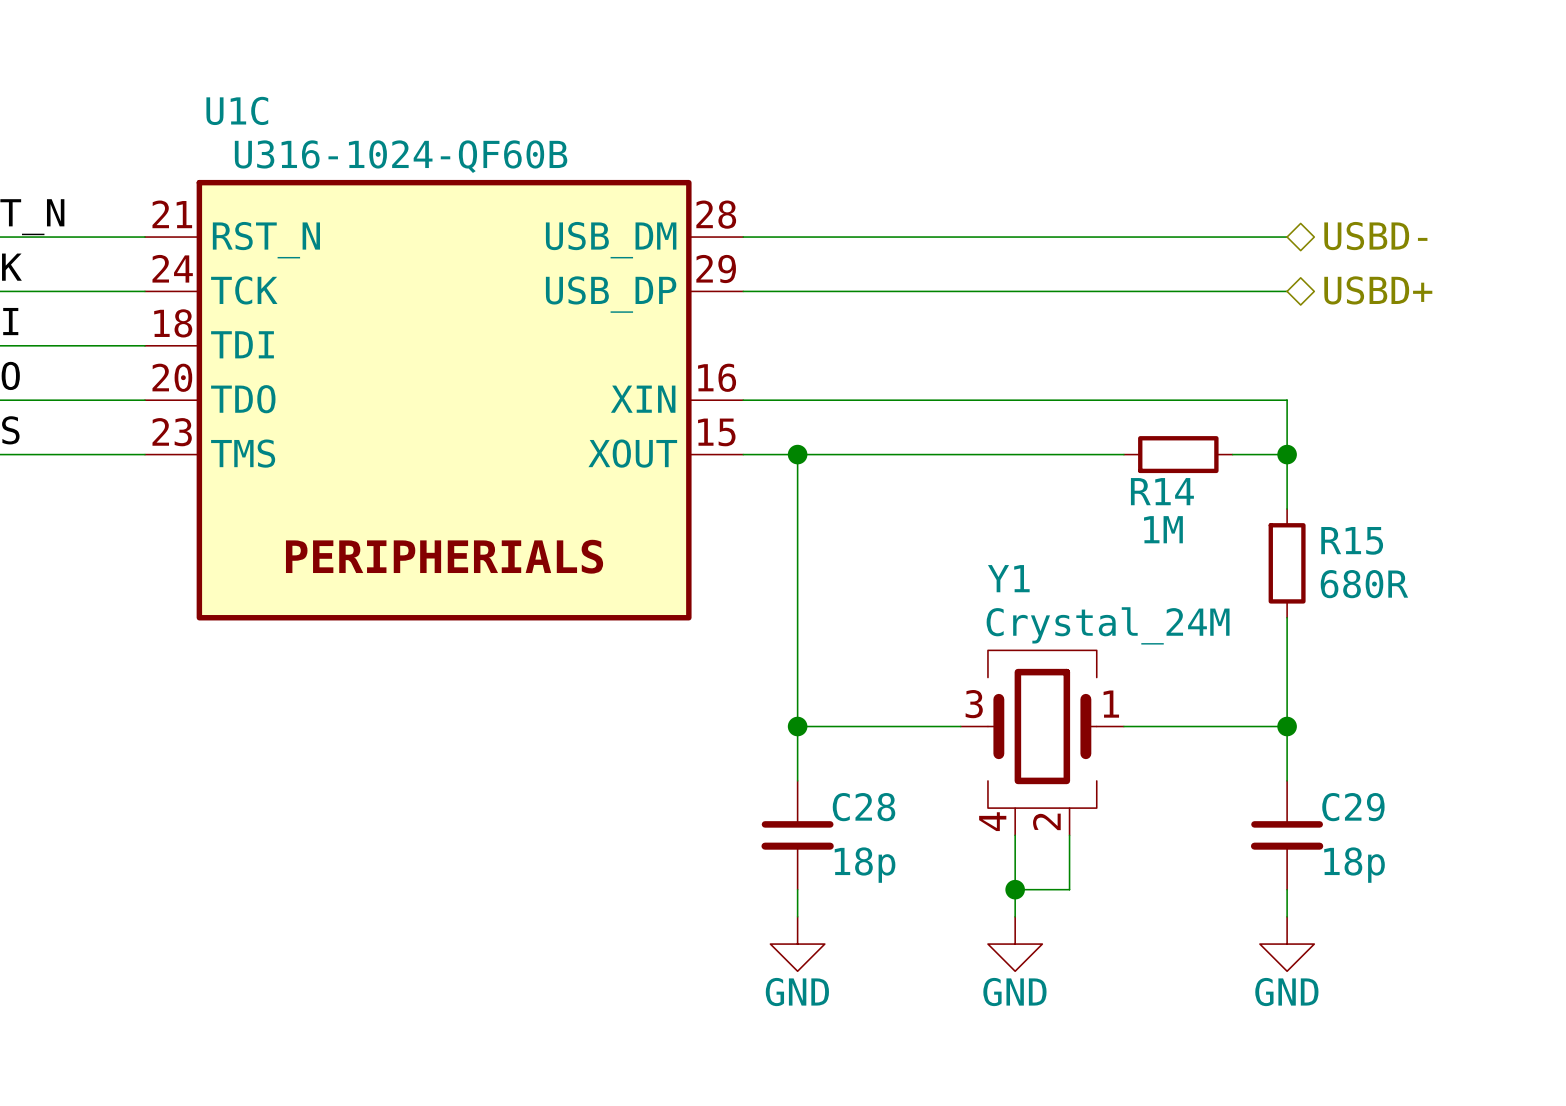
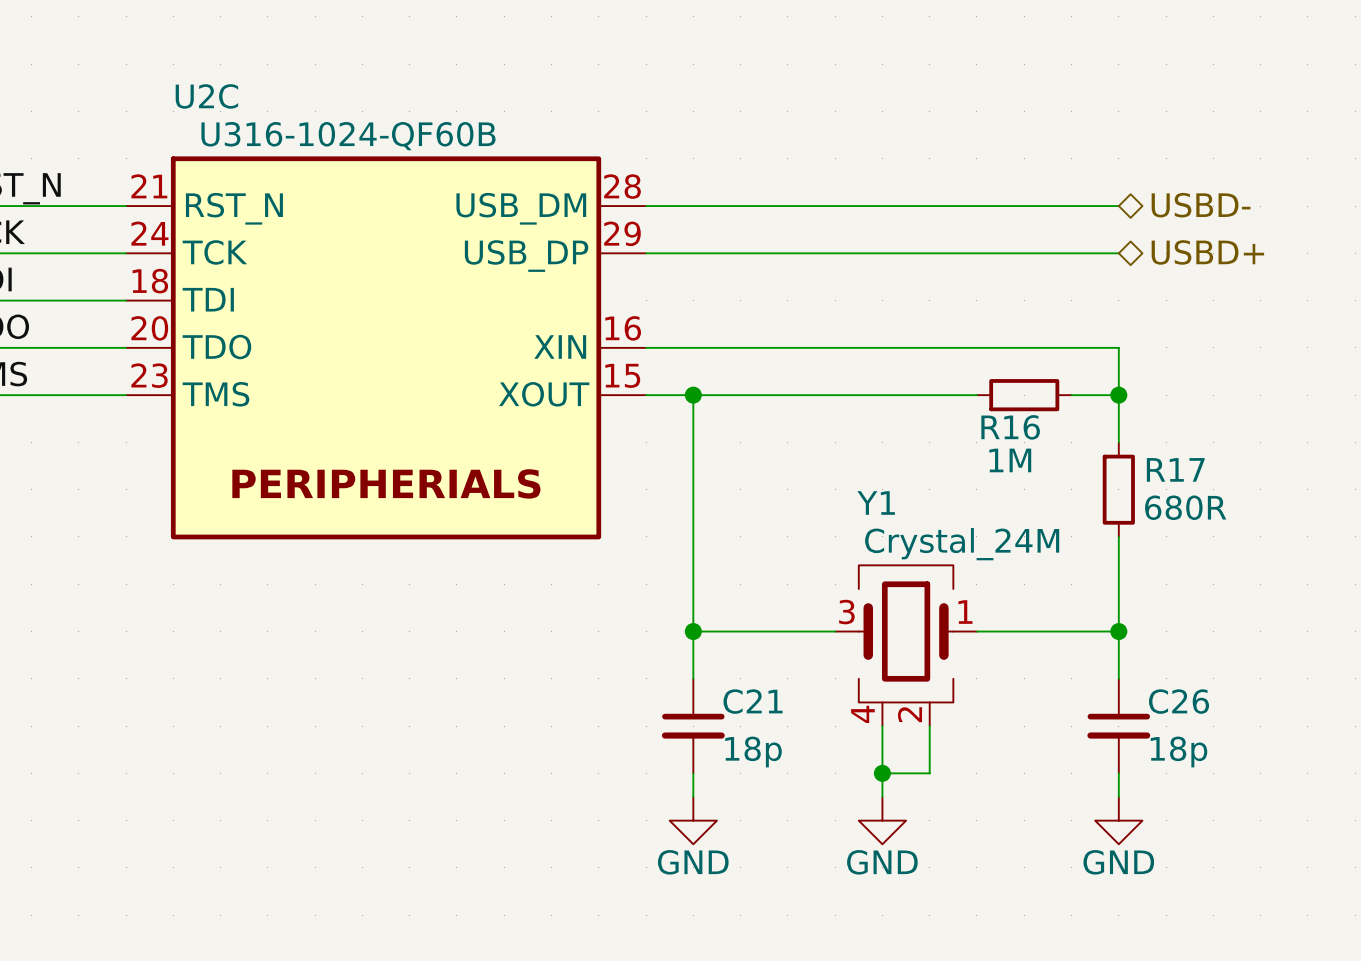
U1C name: U1C (237, 110) -> U2C (206, 96)
R14 name: R14 (1162, 491) -> R16 (1010, 427)
R15 name: R15 (1352, 540) -> R17 (1175, 469)
C28 name: C28 (864, 807) -> C21 (753, 701)
C29 name: C29 (1353, 807) -> C26 (1179, 701)

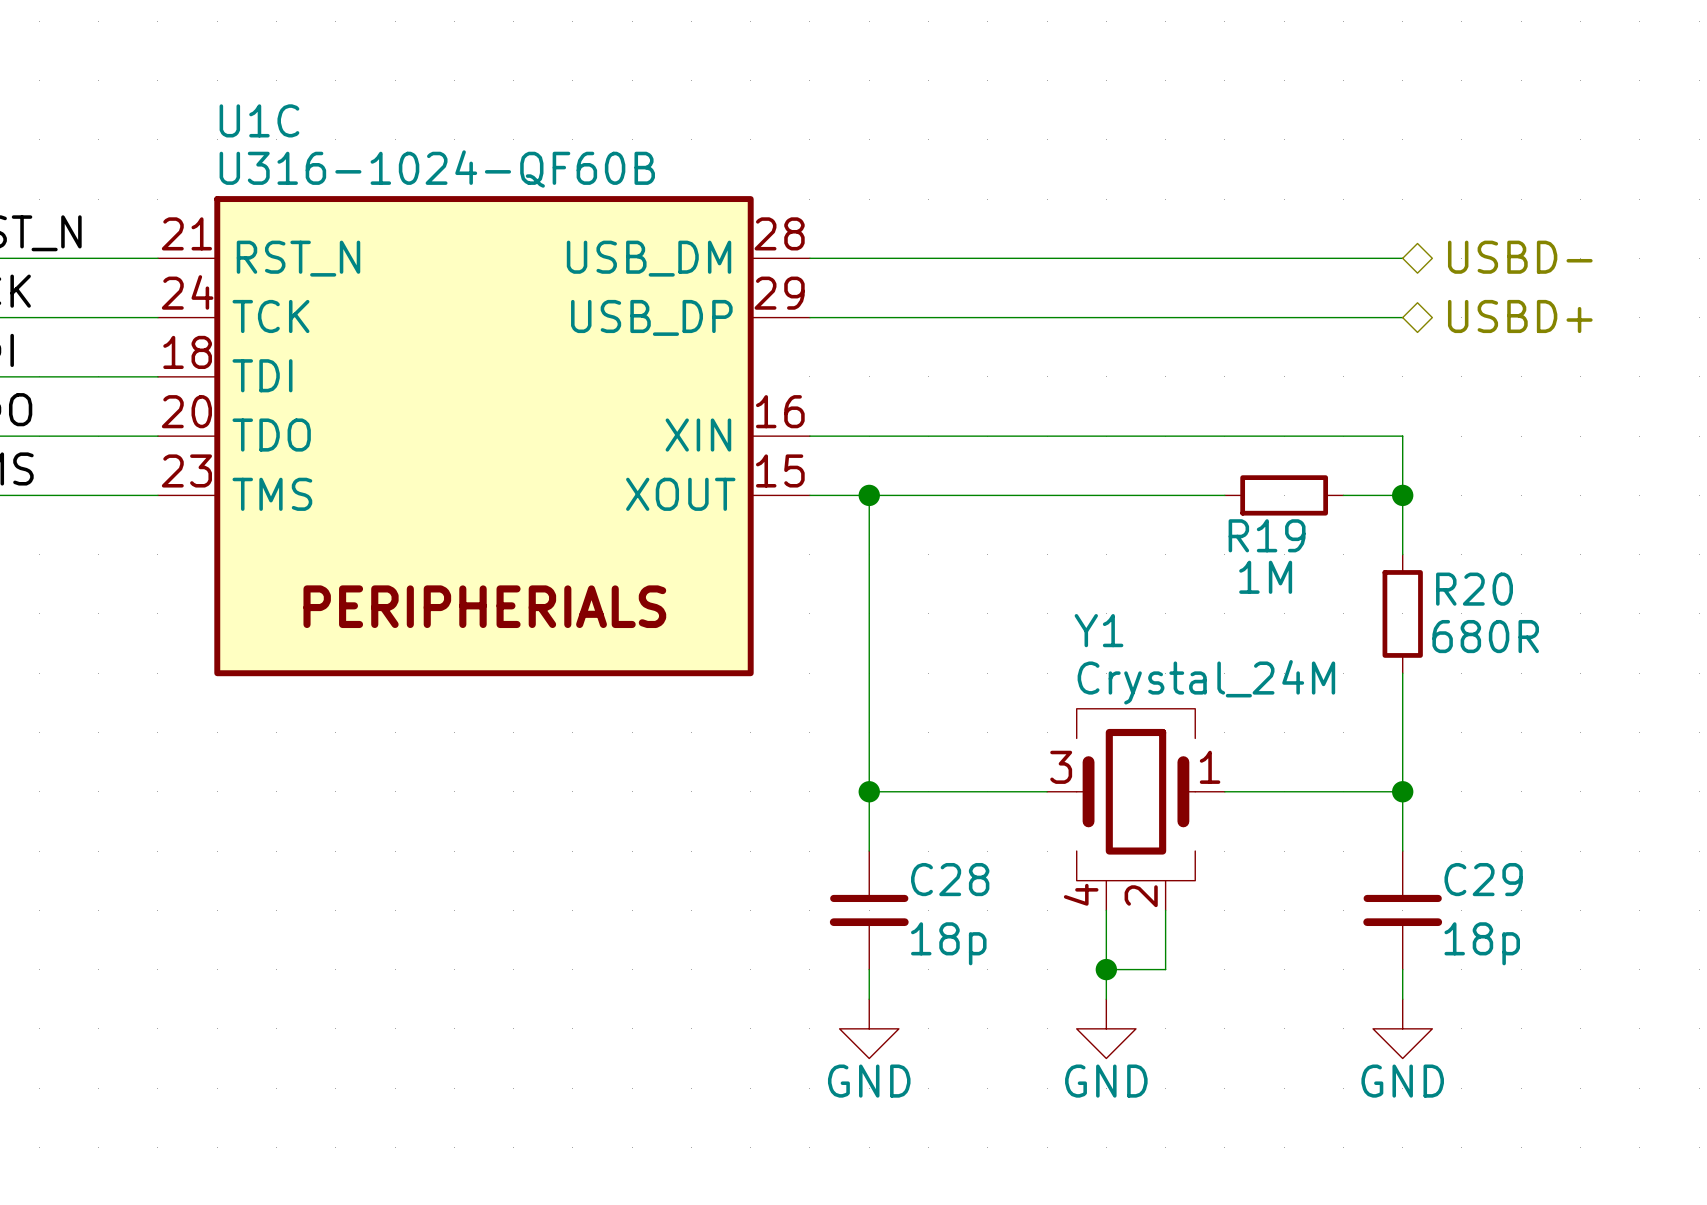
U2C name: U2C (206, 96) -> U1C (259, 120)
R16 name: R16 (1010, 427) -> R19 (1267, 535)
R17 name: R17 (1175, 469) -> R20 (1474, 589)
C21 name: C21 (753, 701) -> C28 (950, 879)
C26 name: C26 (1179, 701) -> C29 (1483, 879)

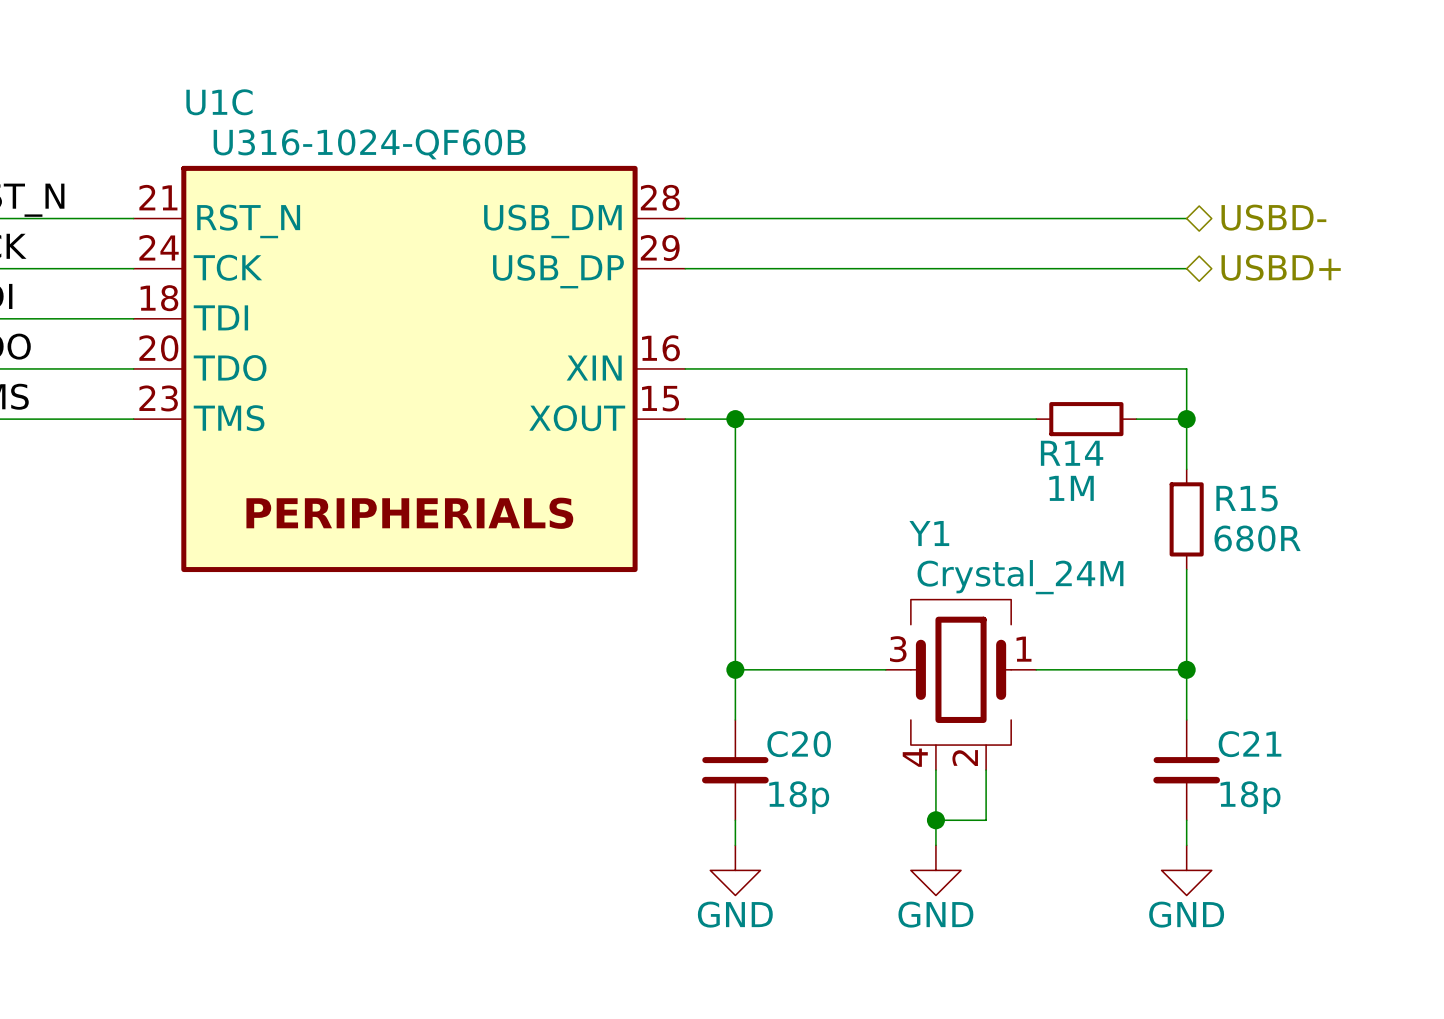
R19 name: R19 (1267, 535) -> R14 (1072, 453)
R20 name: R20 (1474, 589) -> R15 (1247, 498)
C28 name: C28 (950, 879) -> C20 (799, 744)
C29 name: C29 (1483, 879) -> C21 (1250, 744)

